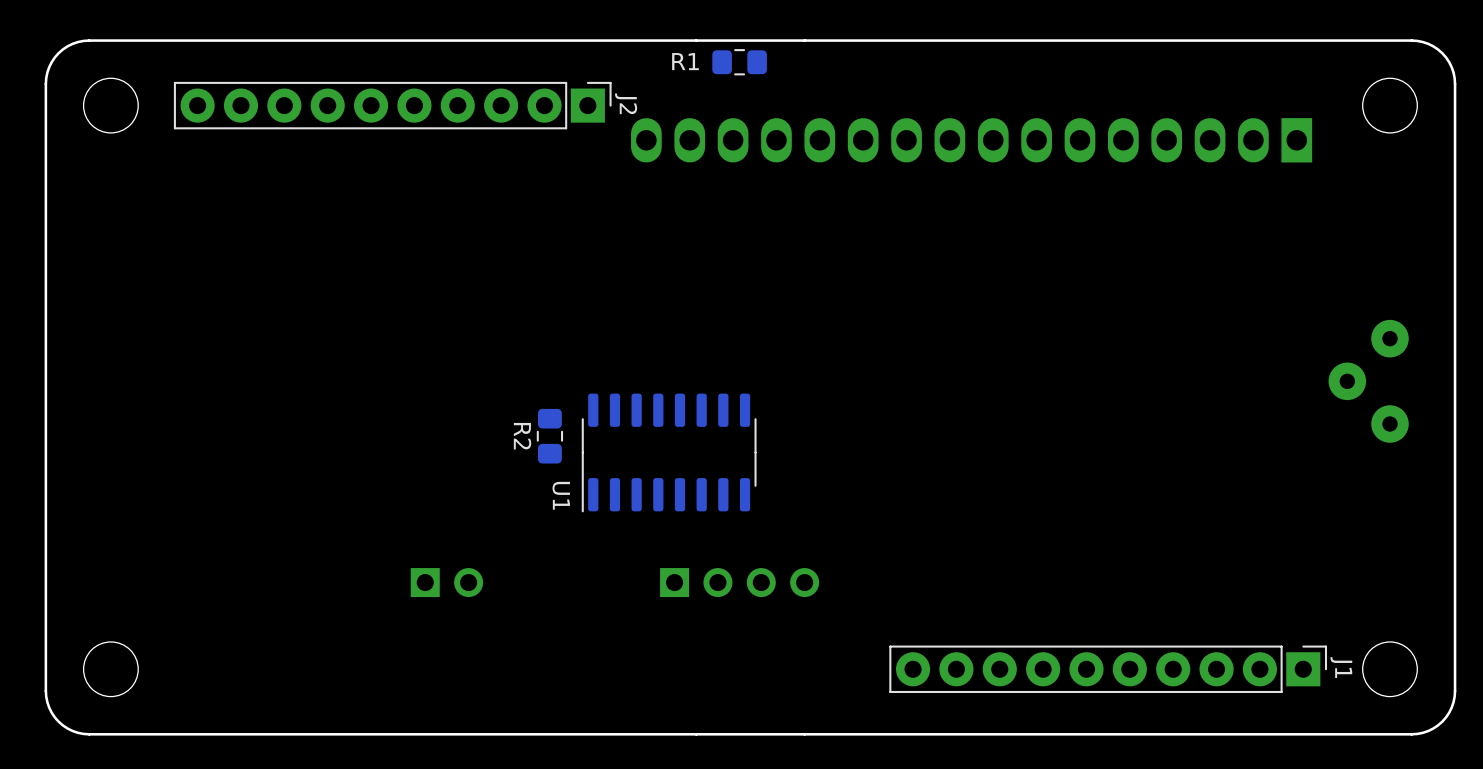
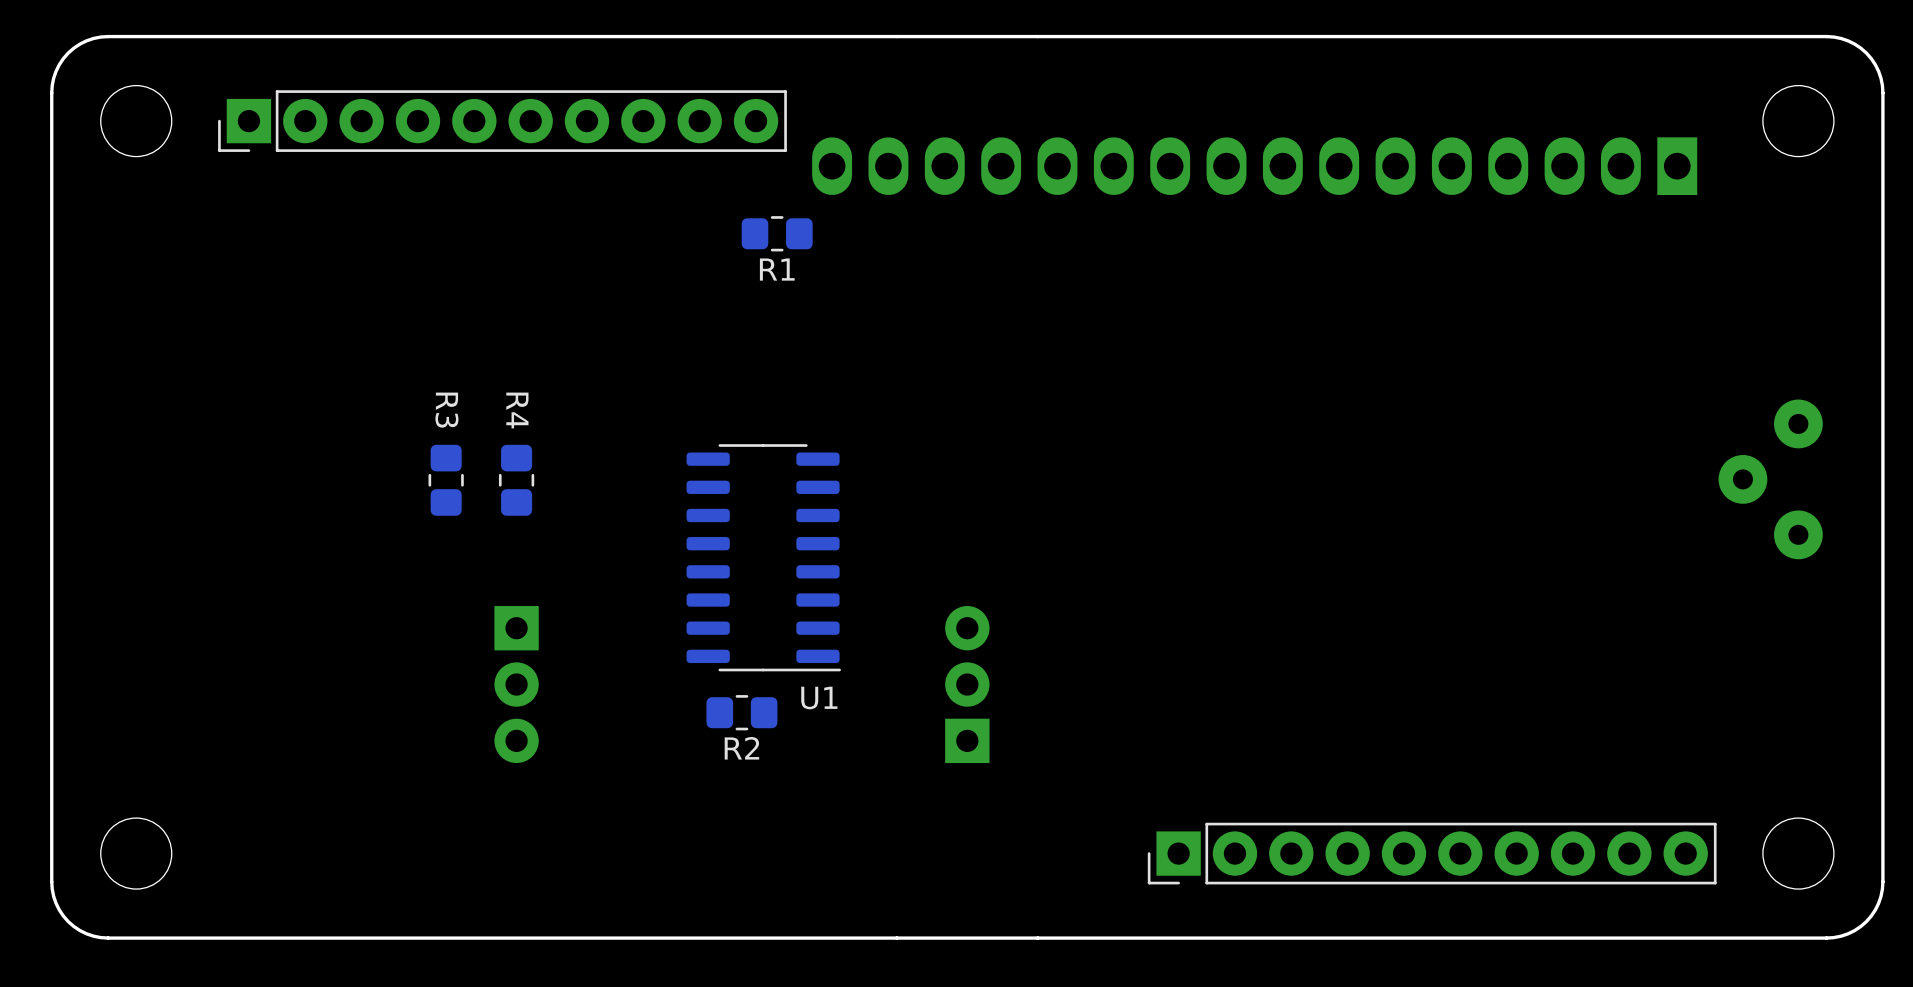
R1 footprint: [712, 49, 767, 76] -> [741, 216, 813, 252]
R1 name position: R1 (685, 61) -> R1 (777, 269)
J2: (392, 105) -> none
part: none -> (502, 121)
R3: none -> (446, 480)
R4: none -> (516, 480)
R2 footprint: [536, 408, 564, 464] -> [706, 695, 778, 731]
R2 name position: R2 (522, 436) -> R2 (741, 748)
U1 rotation: 0° (669, 452) -> 90° counterclockwise (763, 557)
part: none -> (516, 684)
part: none -> (967, 684)
part: (446, 582) -> none
part: (739, 582) -> none
J1: (1108, 669) -> none
part: none -> (1432, 853)

